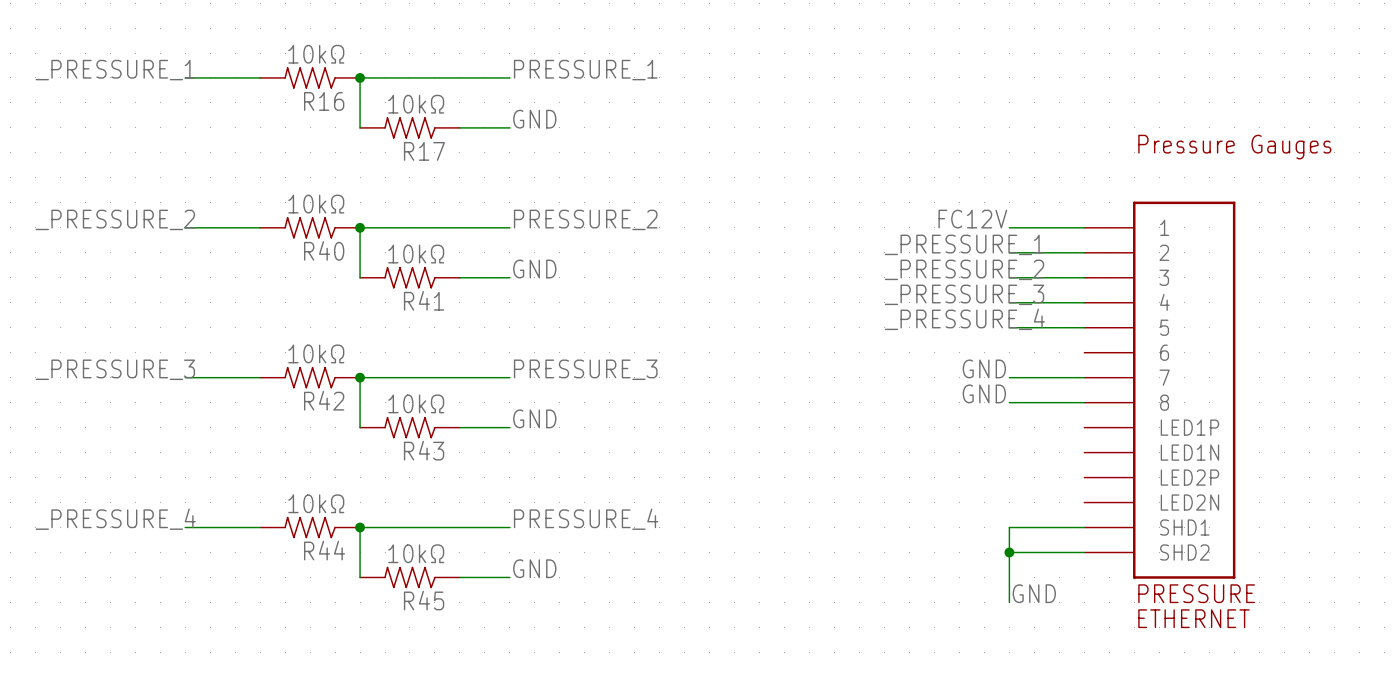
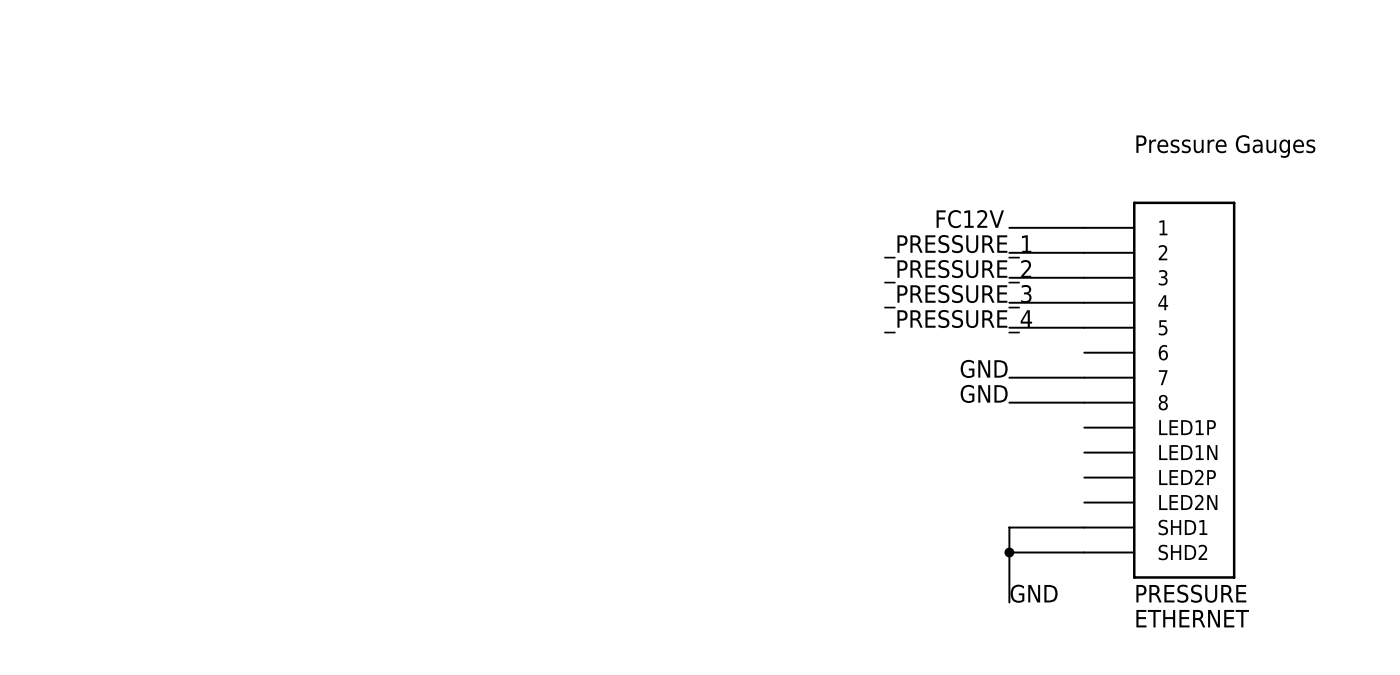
label: _PRESSURE_1 (115, 70) -> none
label: PRESSURE_1 (585, 70) -> none
wire: (185, 77) (260, 77) -> none
R16: 10kΩ (310, 77) -> none
junction: (360, 77) -> none
wire: (509, 77) (360, 77) (360, 127) -> none
label: GND (534, 119) -> none
R17: 10kΩ (409, 127) -> none
wire: (459, 127) (509, 127) -> none
label: _PRESSURE_2 (115, 219) -> none
label: PRESSURE_2 (585, 219) -> none
wire: (185, 227) (260, 227) -> none
R40: 10kΩ (310, 227) -> none
junction: (360, 227) -> none
wire: (509, 227) (360, 227) (360, 277) -> none
label: GND (534, 269) -> none
R41: 10kΩ (409, 277) -> none
wire: (459, 277) (509, 277) -> none
label: _PRESSURE_3 (115, 369) -> none
label: PRESSURE_3 (585, 369) -> none
wire: (185, 377) (260, 377) -> none
R42: 10kΩ (310, 377) -> none
junction: (360, 377) -> none
wire: (509, 377) (360, 377) (360, 427) -> none
label: GND (534, 418) -> none
R43: 10kΩ (409, 427) -> none
wire: (459, 427) (509, 427) -> none
label: _PRESSURE_4 (115, 519) -> none
label: PRESSURE_4 (586, 519) -> none
wire: (185, 527) (260, 527) -> none
R44: 10kΩ (310, 527) -> none
junction: (360, 527) -> none
wire: (509, 527) (360, 527) (360, 577) -> none
label: GND (534, 568) -> none
R45: 10kΩ (409, 577) -> none
wire: (459, 577) (509, 577) -> none

